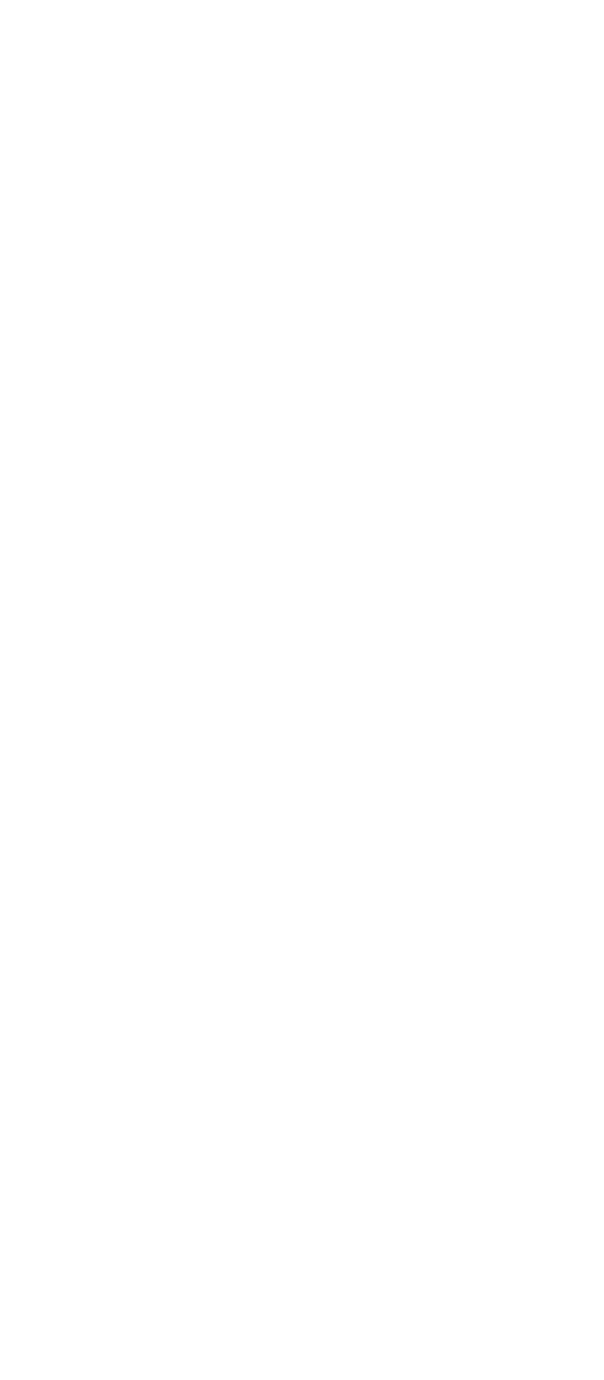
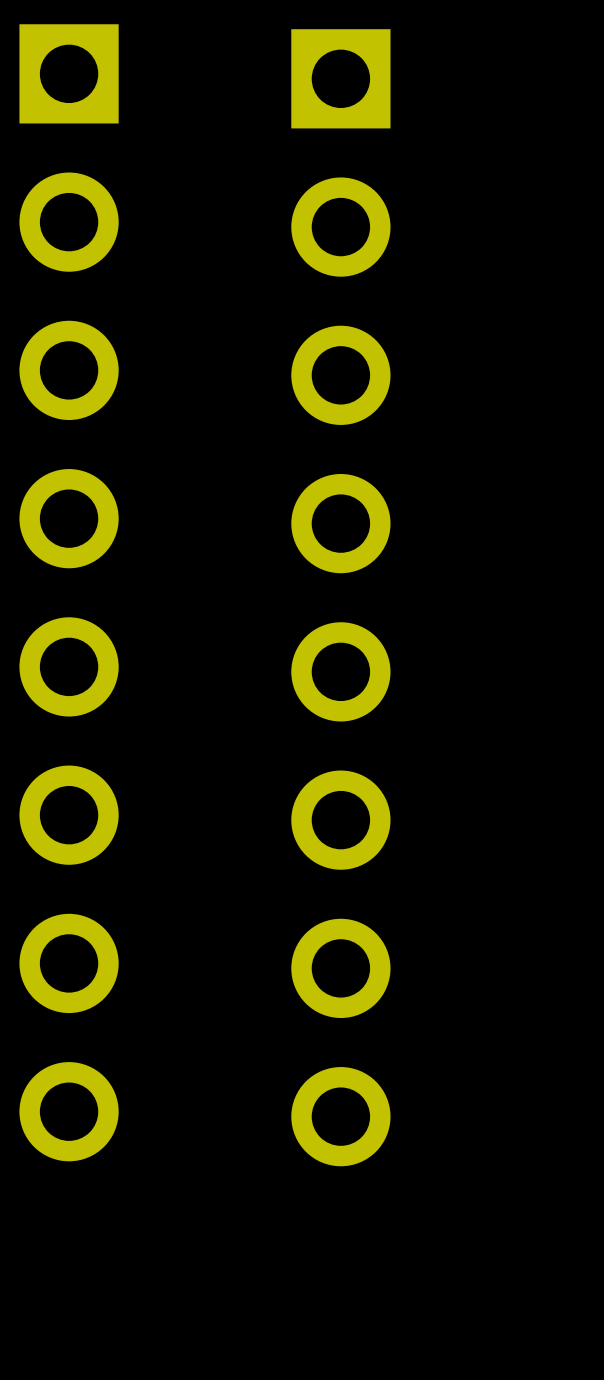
part: none -> (69, 592)
part: none -> (340, 597)

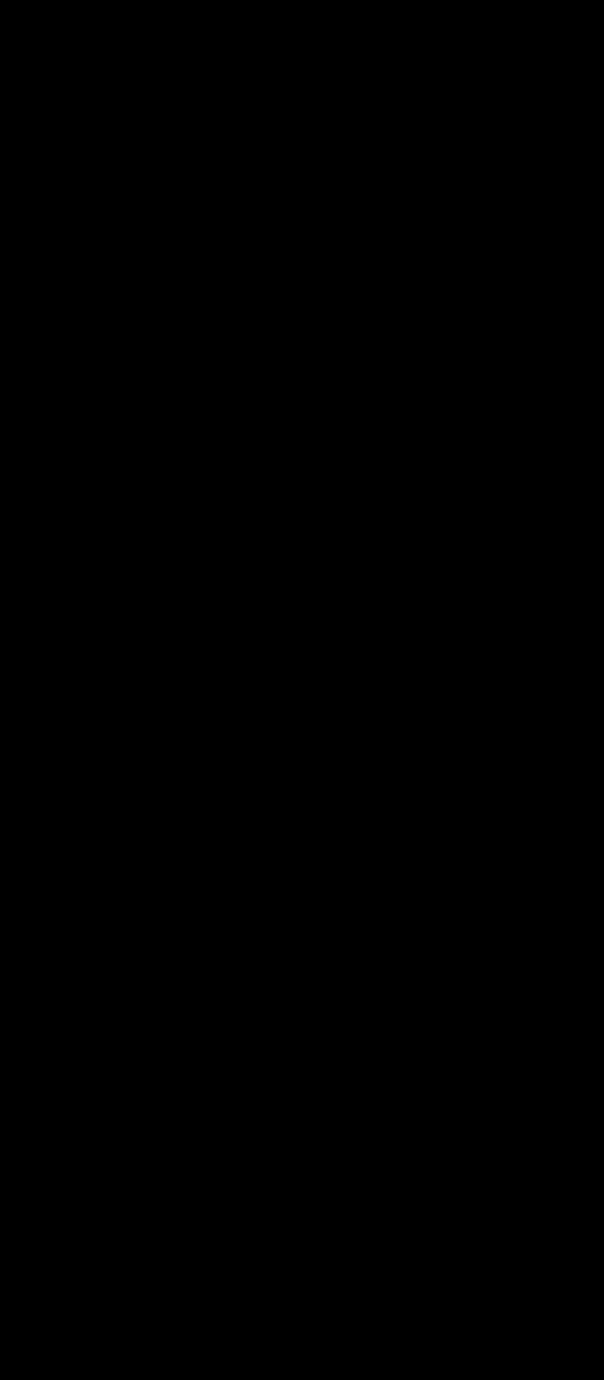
part: (69, 592) -> none
part: (340, 597) -> none

